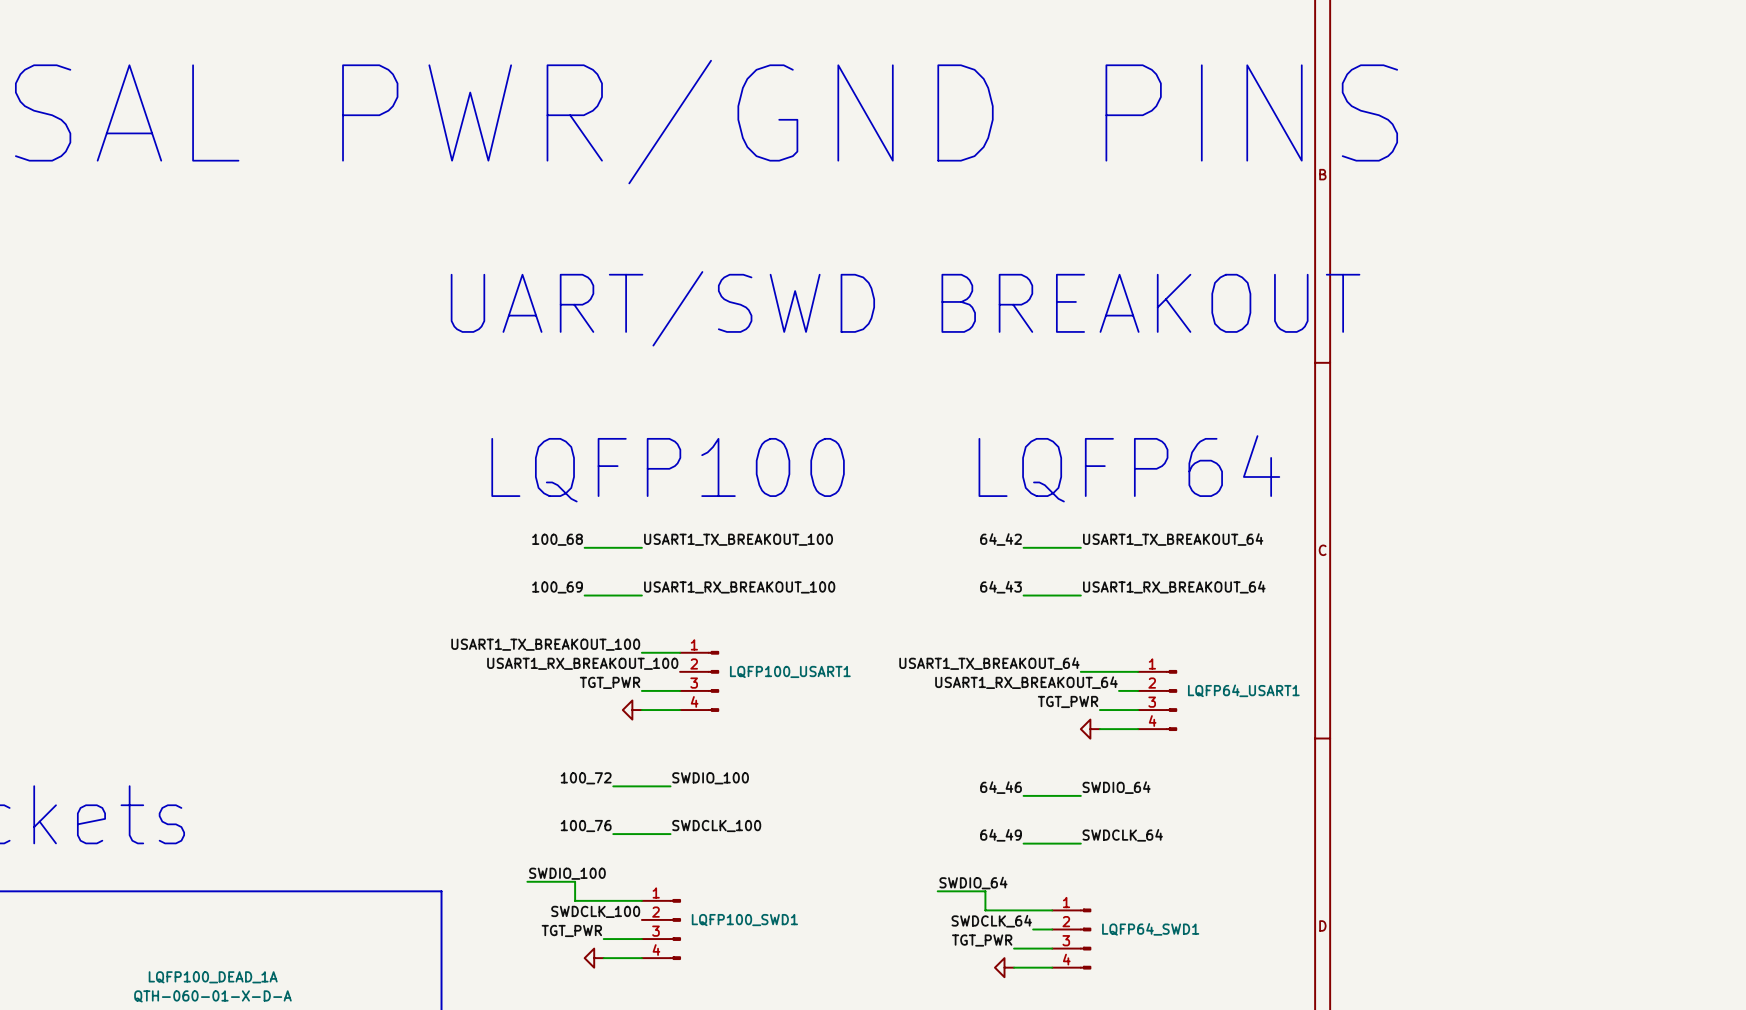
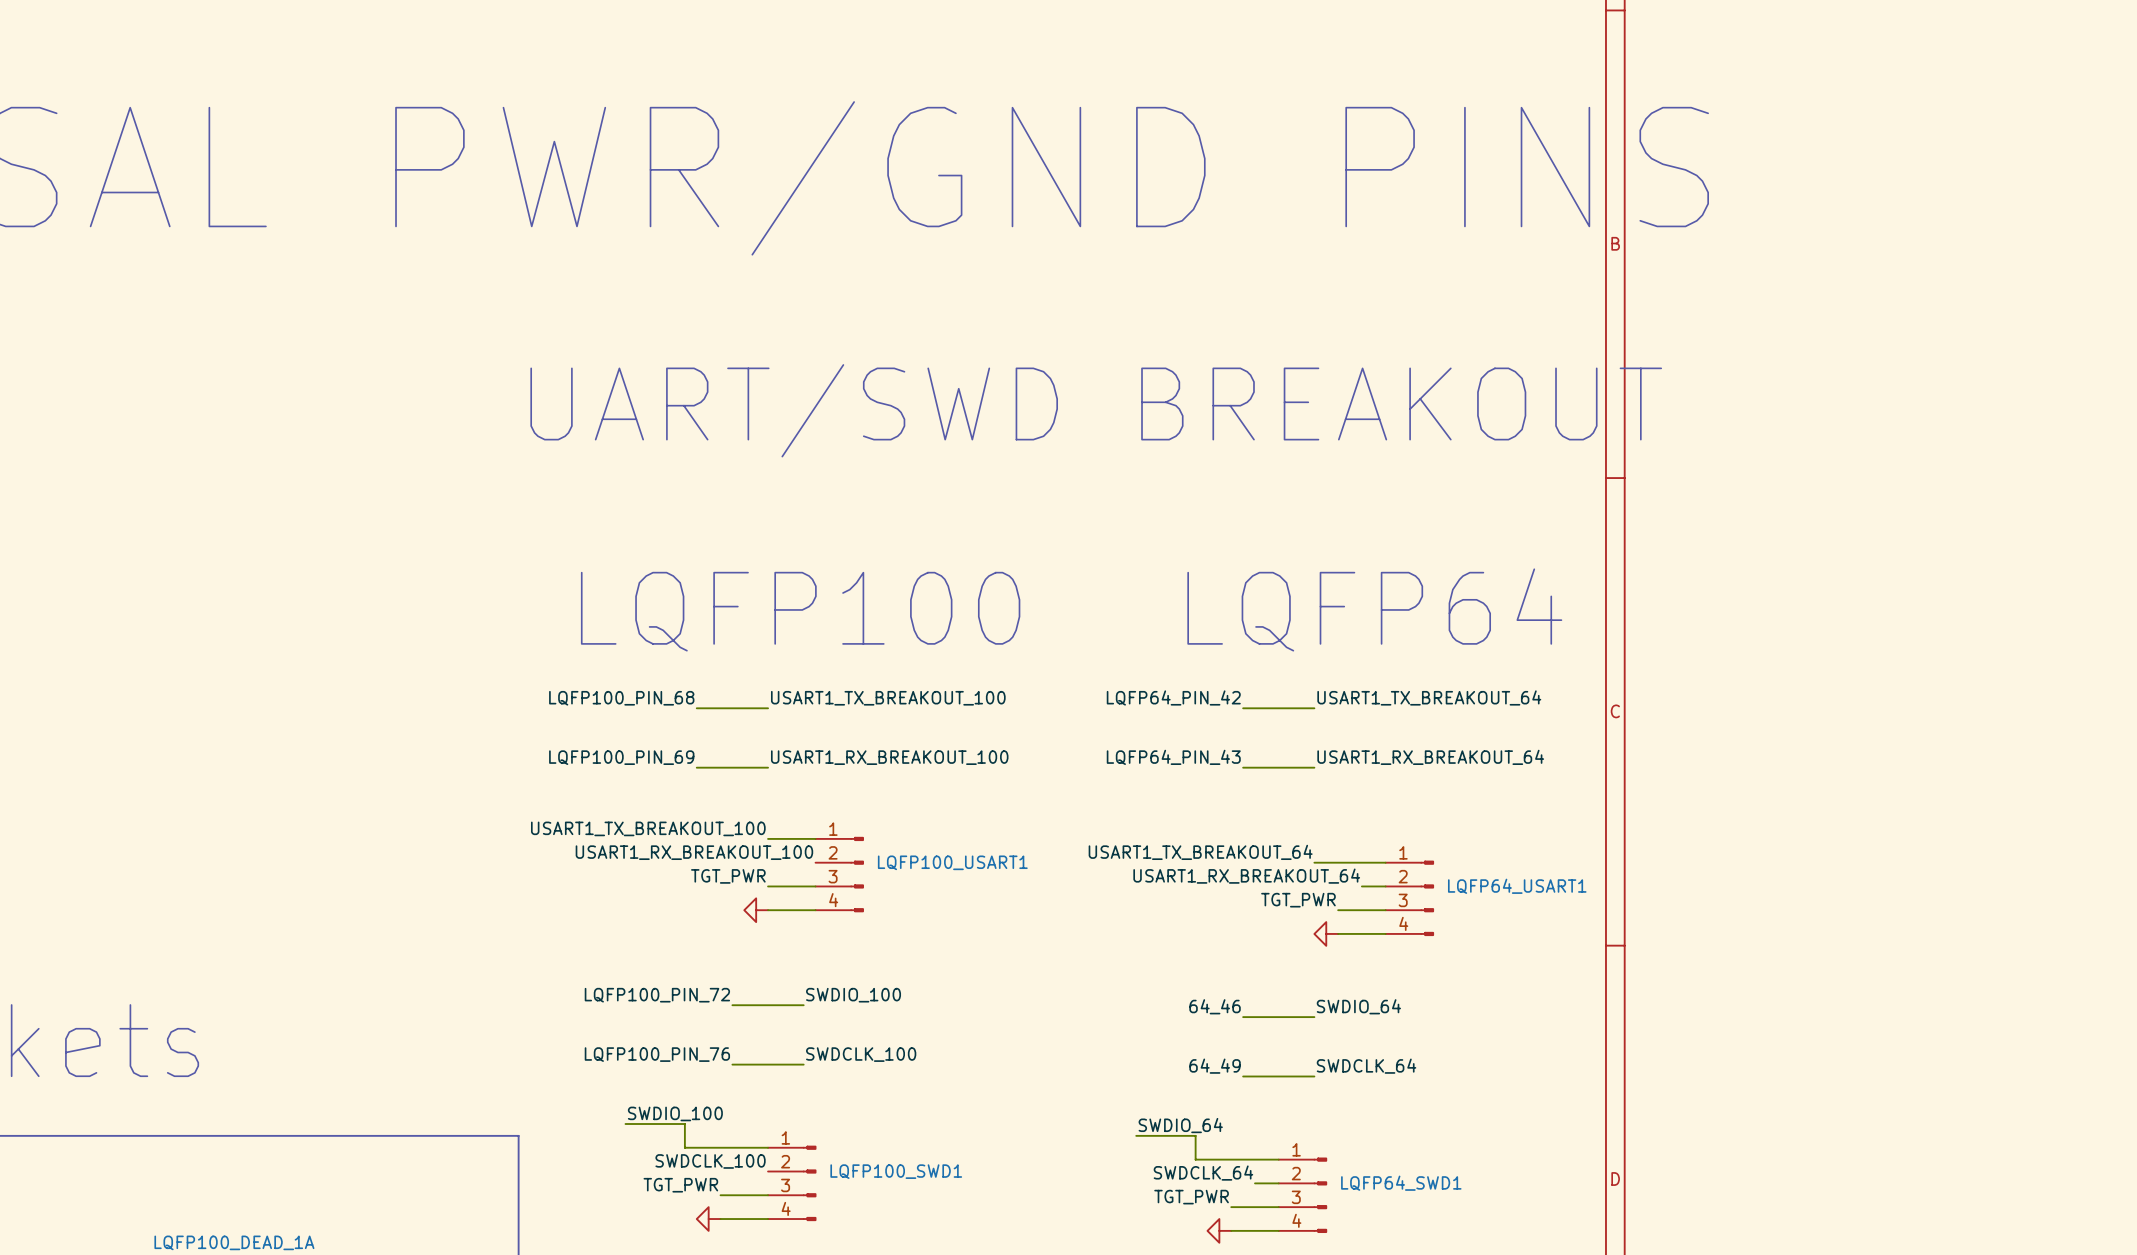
label: 100_68 (557, 539) -> LQFP100_PIN_68 (621, 698)
label: 64_42 (1001, 539) -> LQFP64_PIN_42 (1173, 697)
label: 100_69 (557, 587) -> LQFP100_PIN_69 (621, 757)
label: 64_43 (1001, 587) -> LQFP64_PIN_43 (1173, 757)
label: 100_72 (586, 778) -> LQFP100_PIN_72 (657, 995)
label: 100_76 (586, 826) -> LQFP100_PIN_76 (657, 1054)

